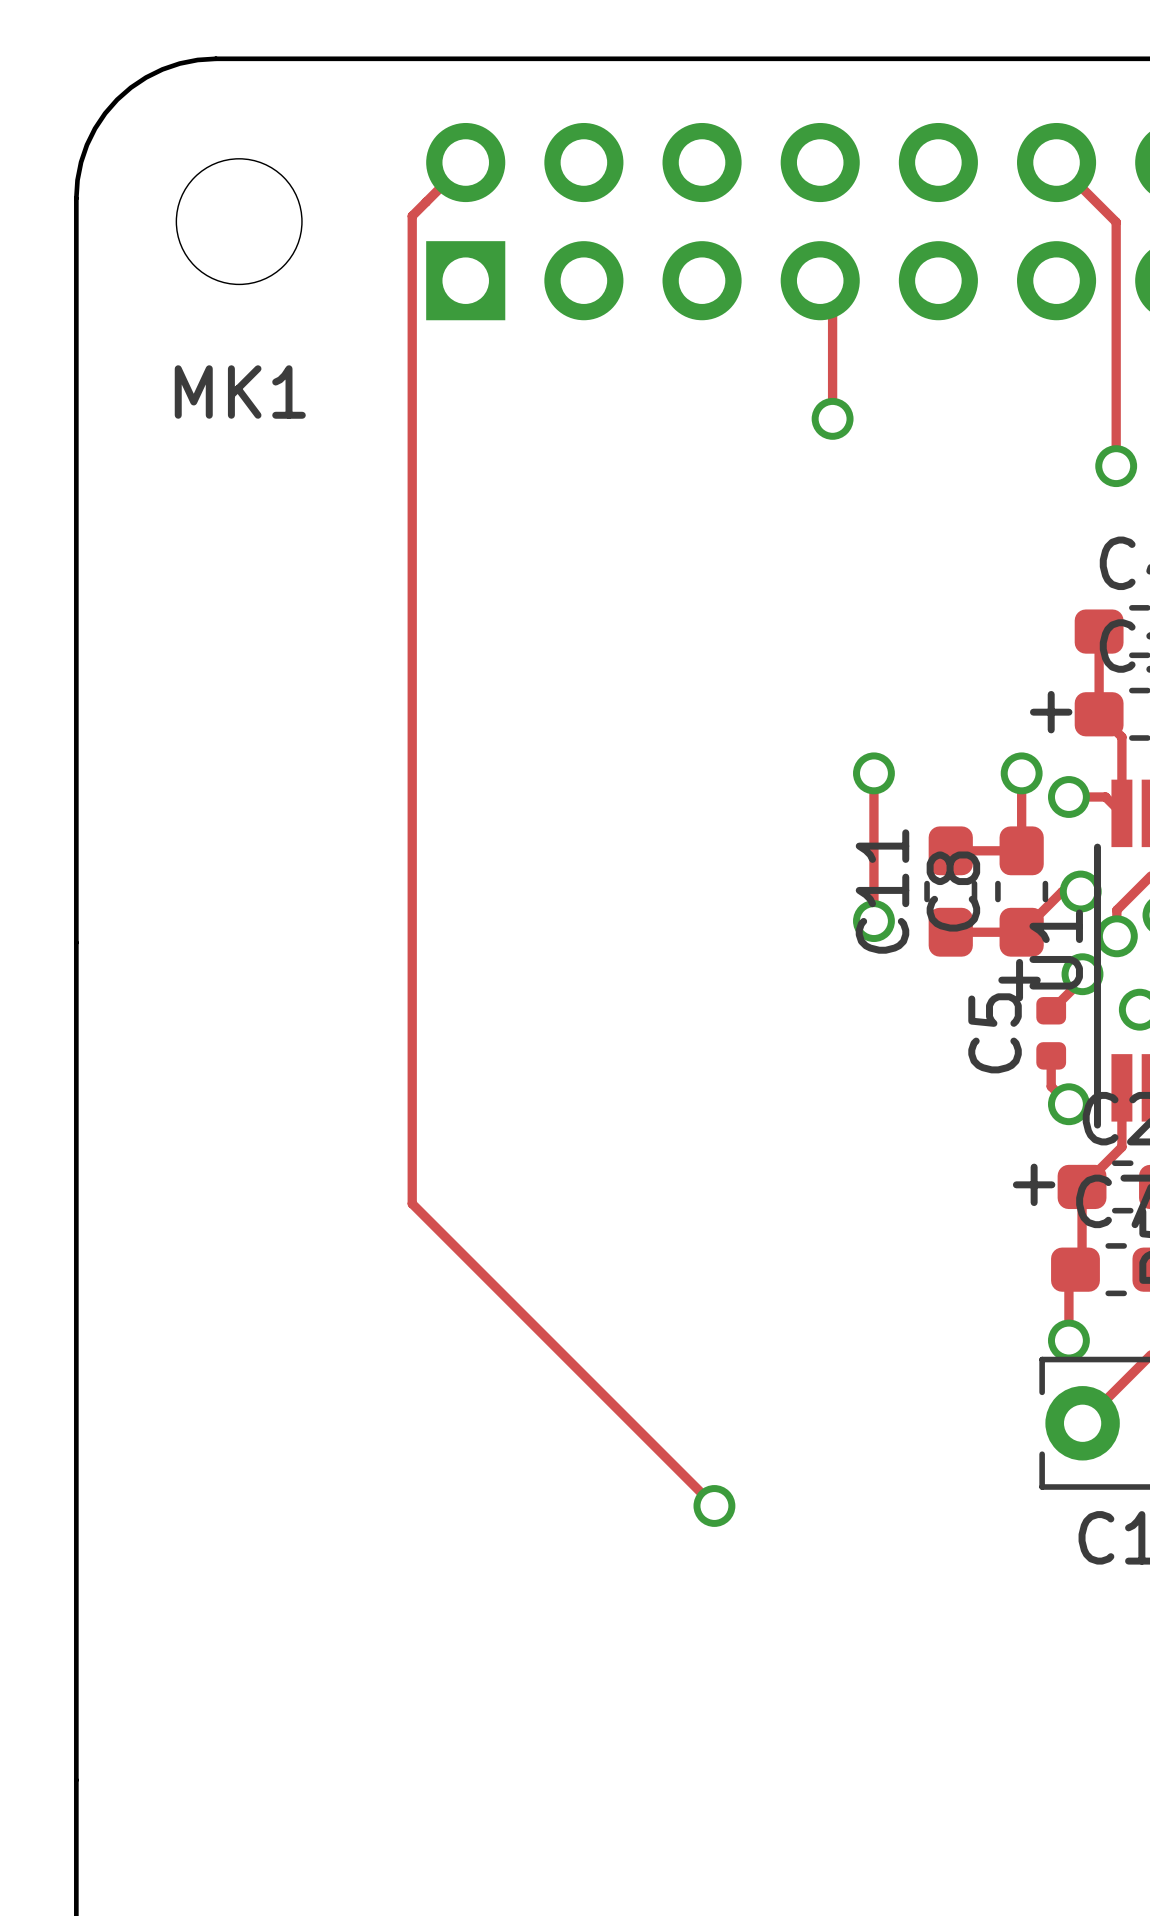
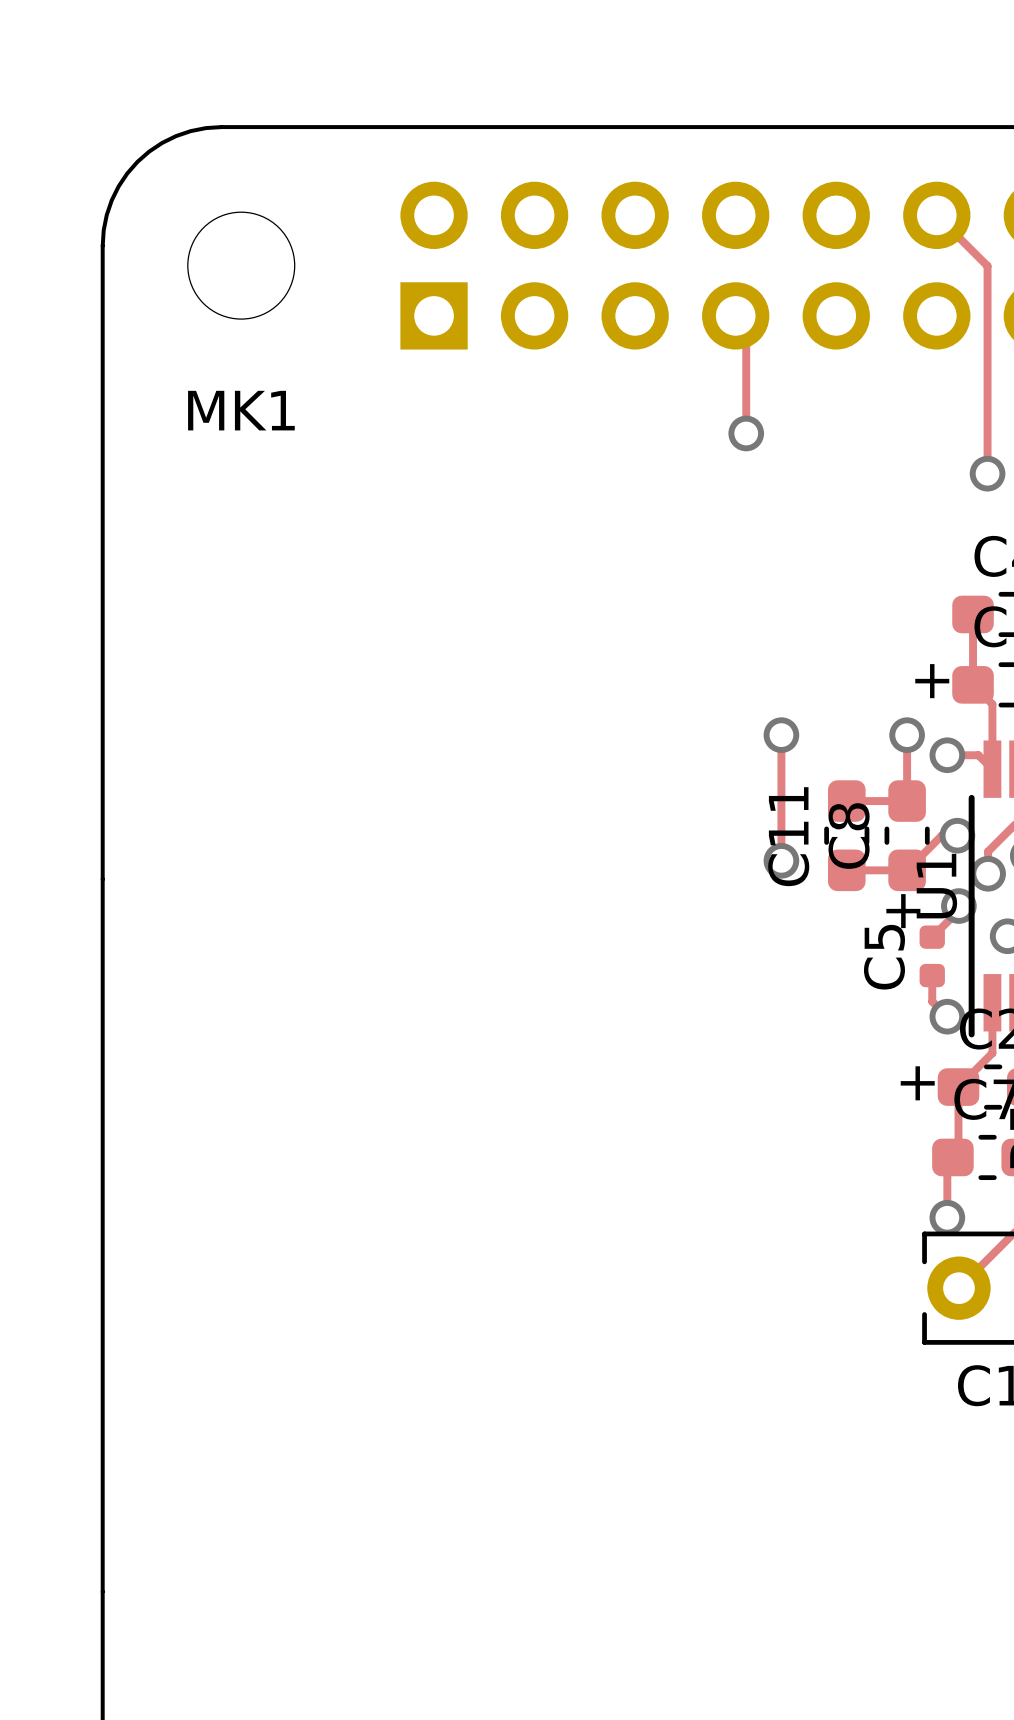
track: (465, 162) (412, 216) (412, 1203) (714, 1505) -> none
via: (714, 1505) -> none

